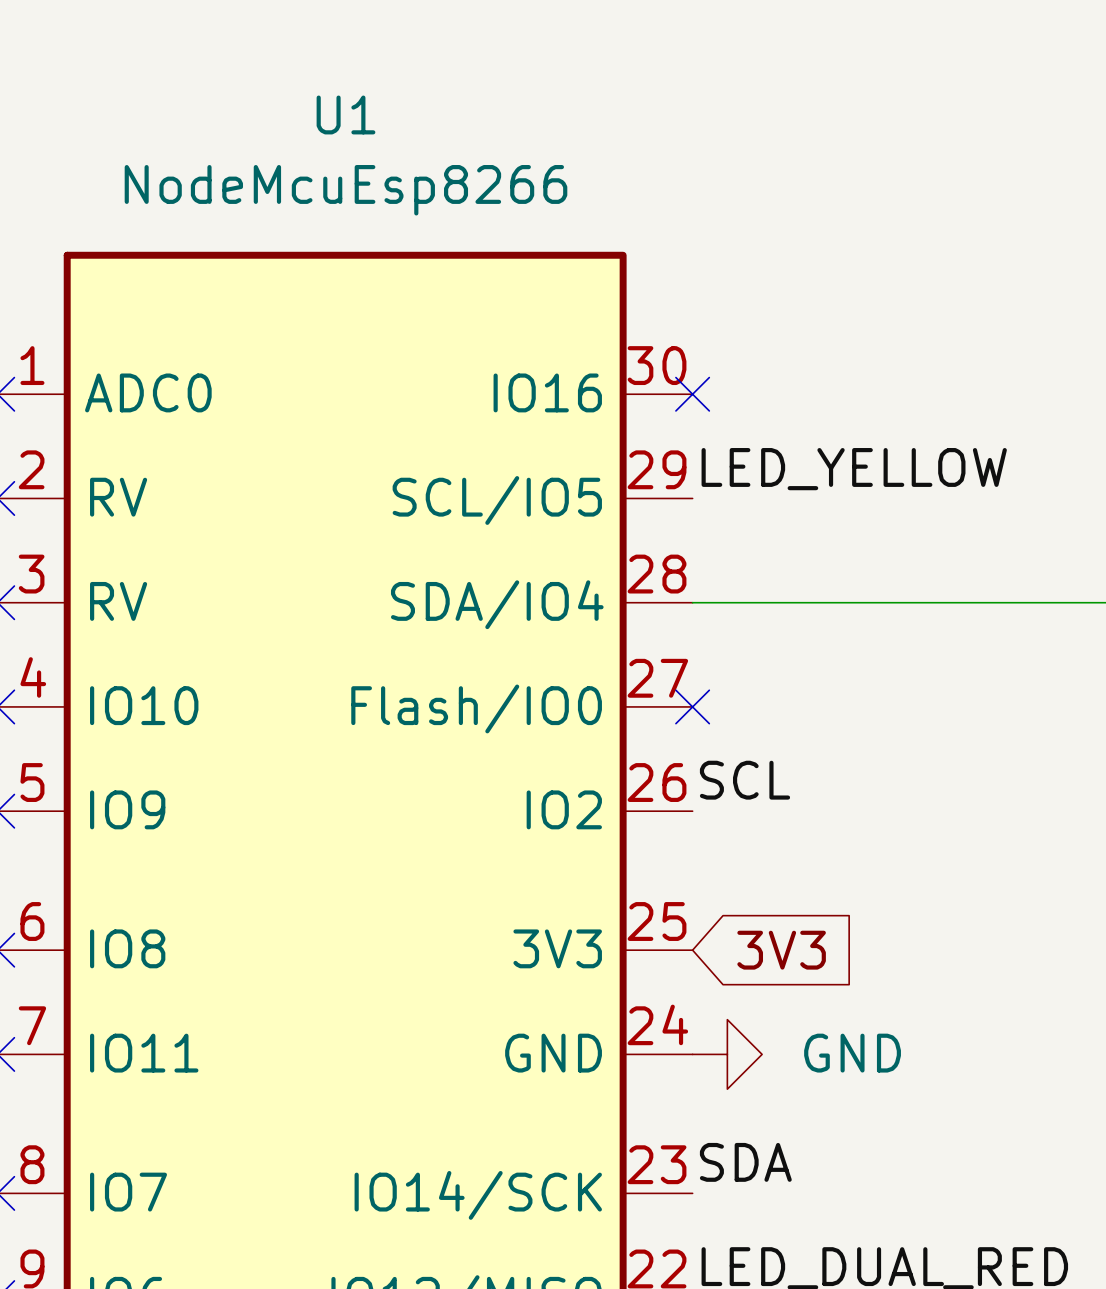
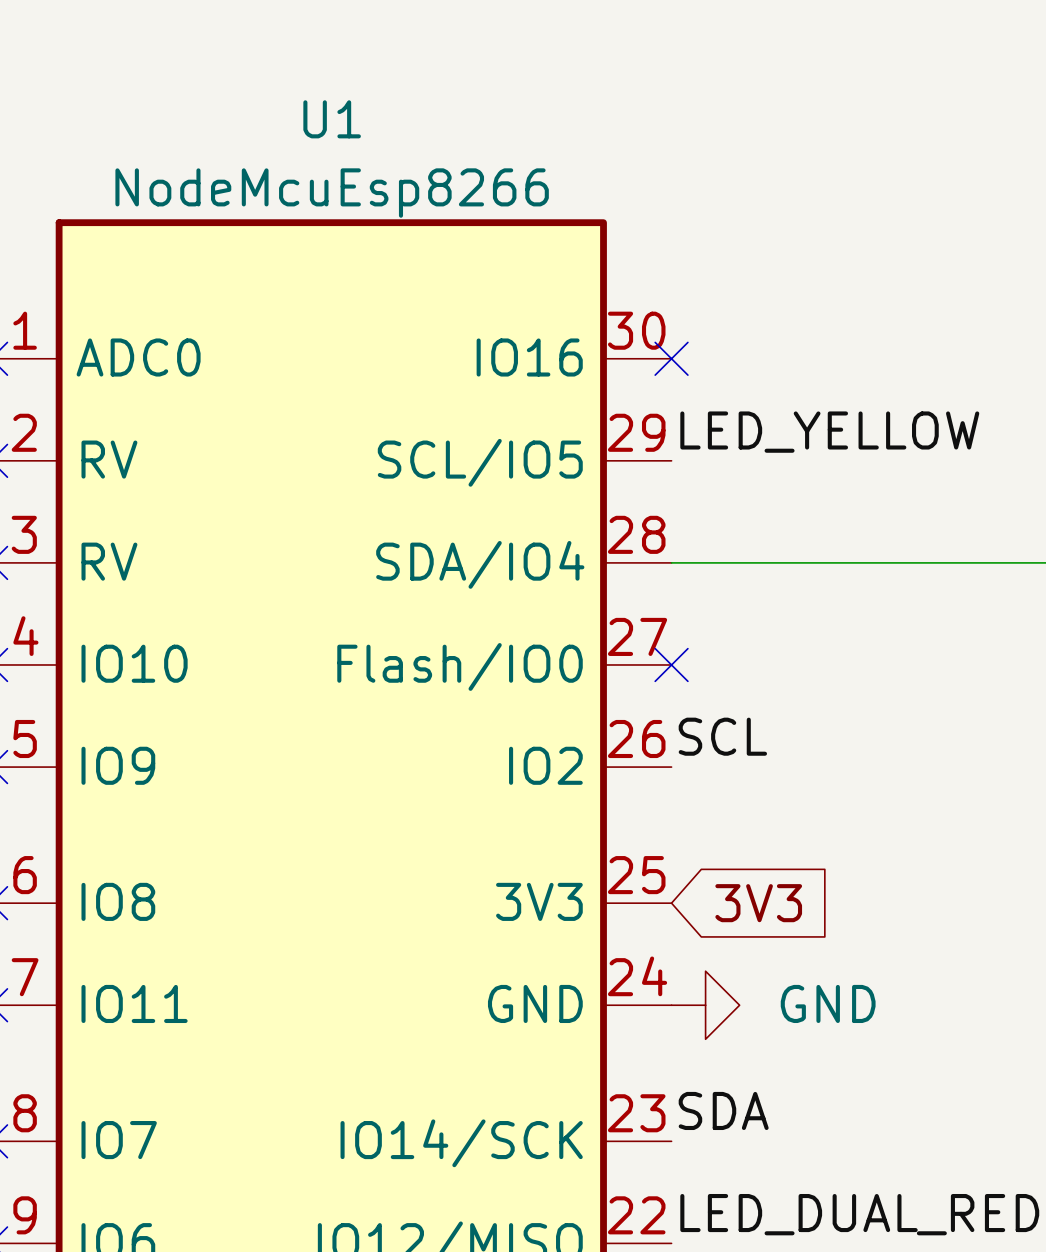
U1 name position: U1 (345, 114) -> U1 (332, 119)
U1 value position: NodeMcuEsp8266 (345, 190) -> NodeMcuEsp8266 (332, 193)

